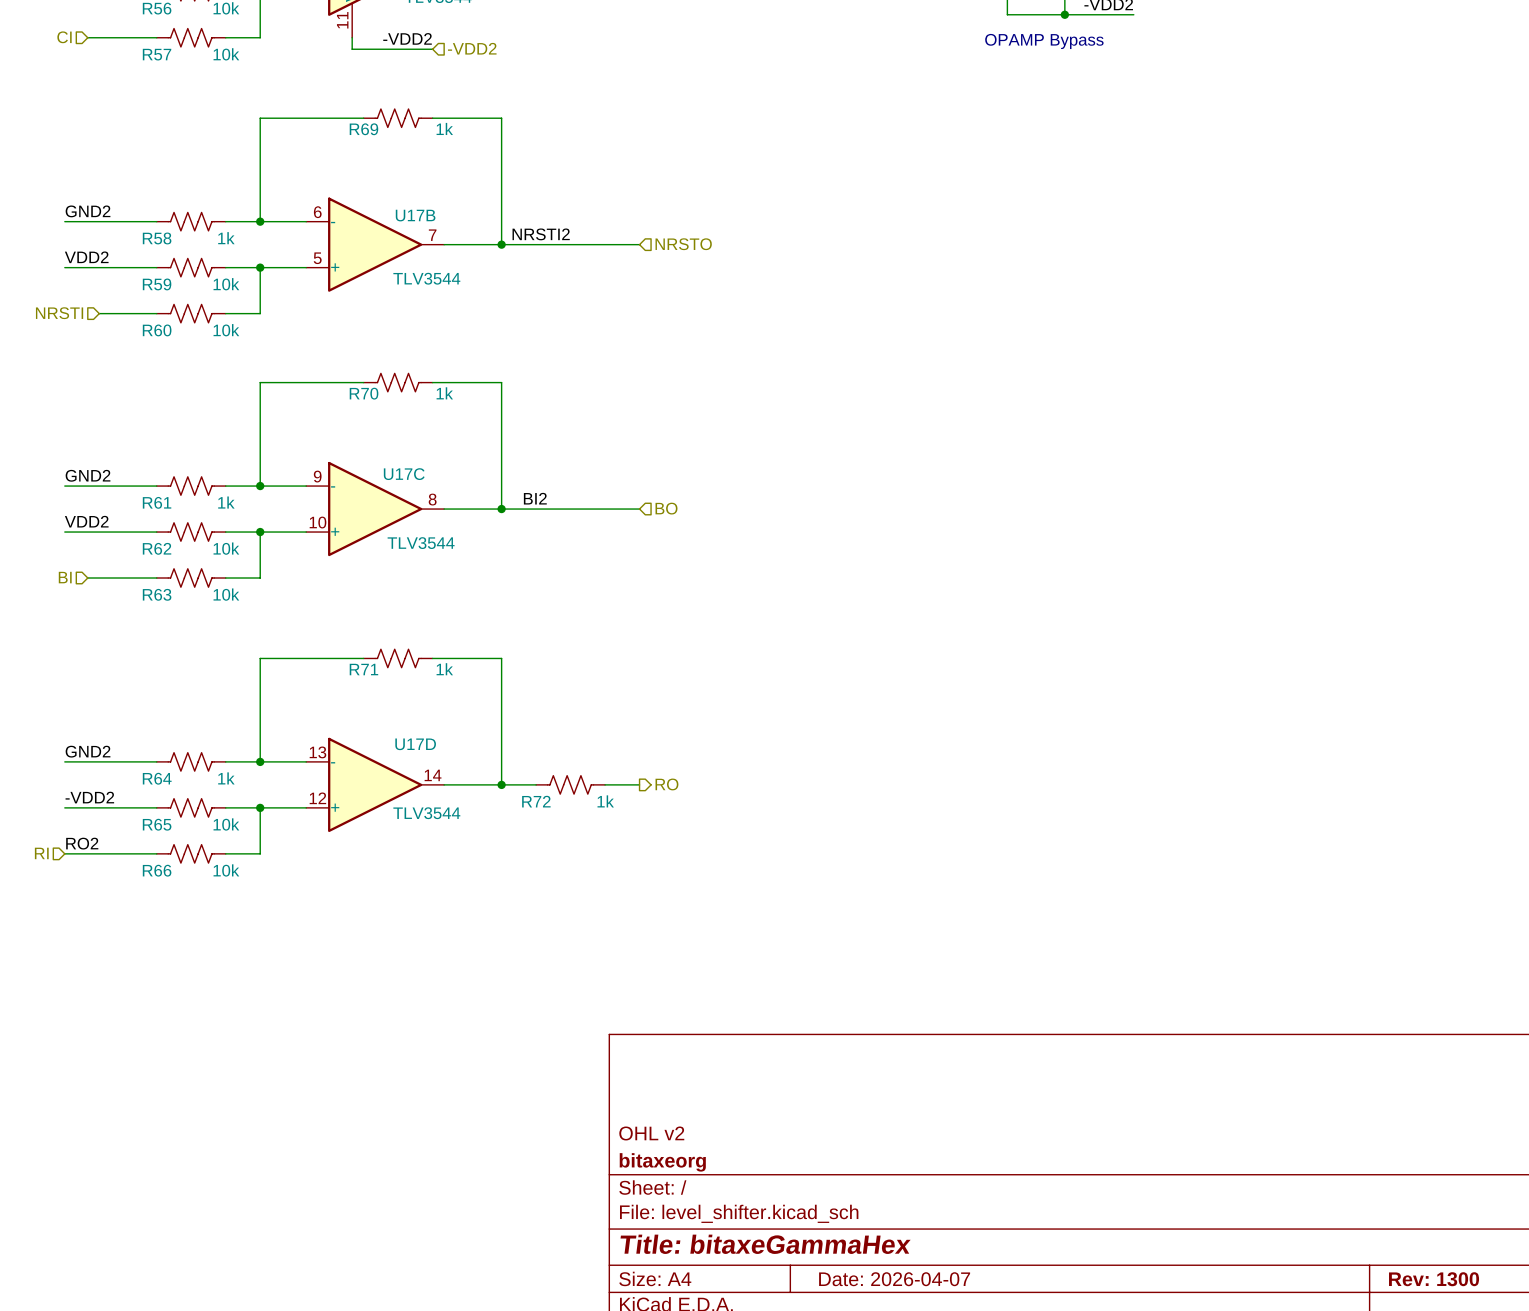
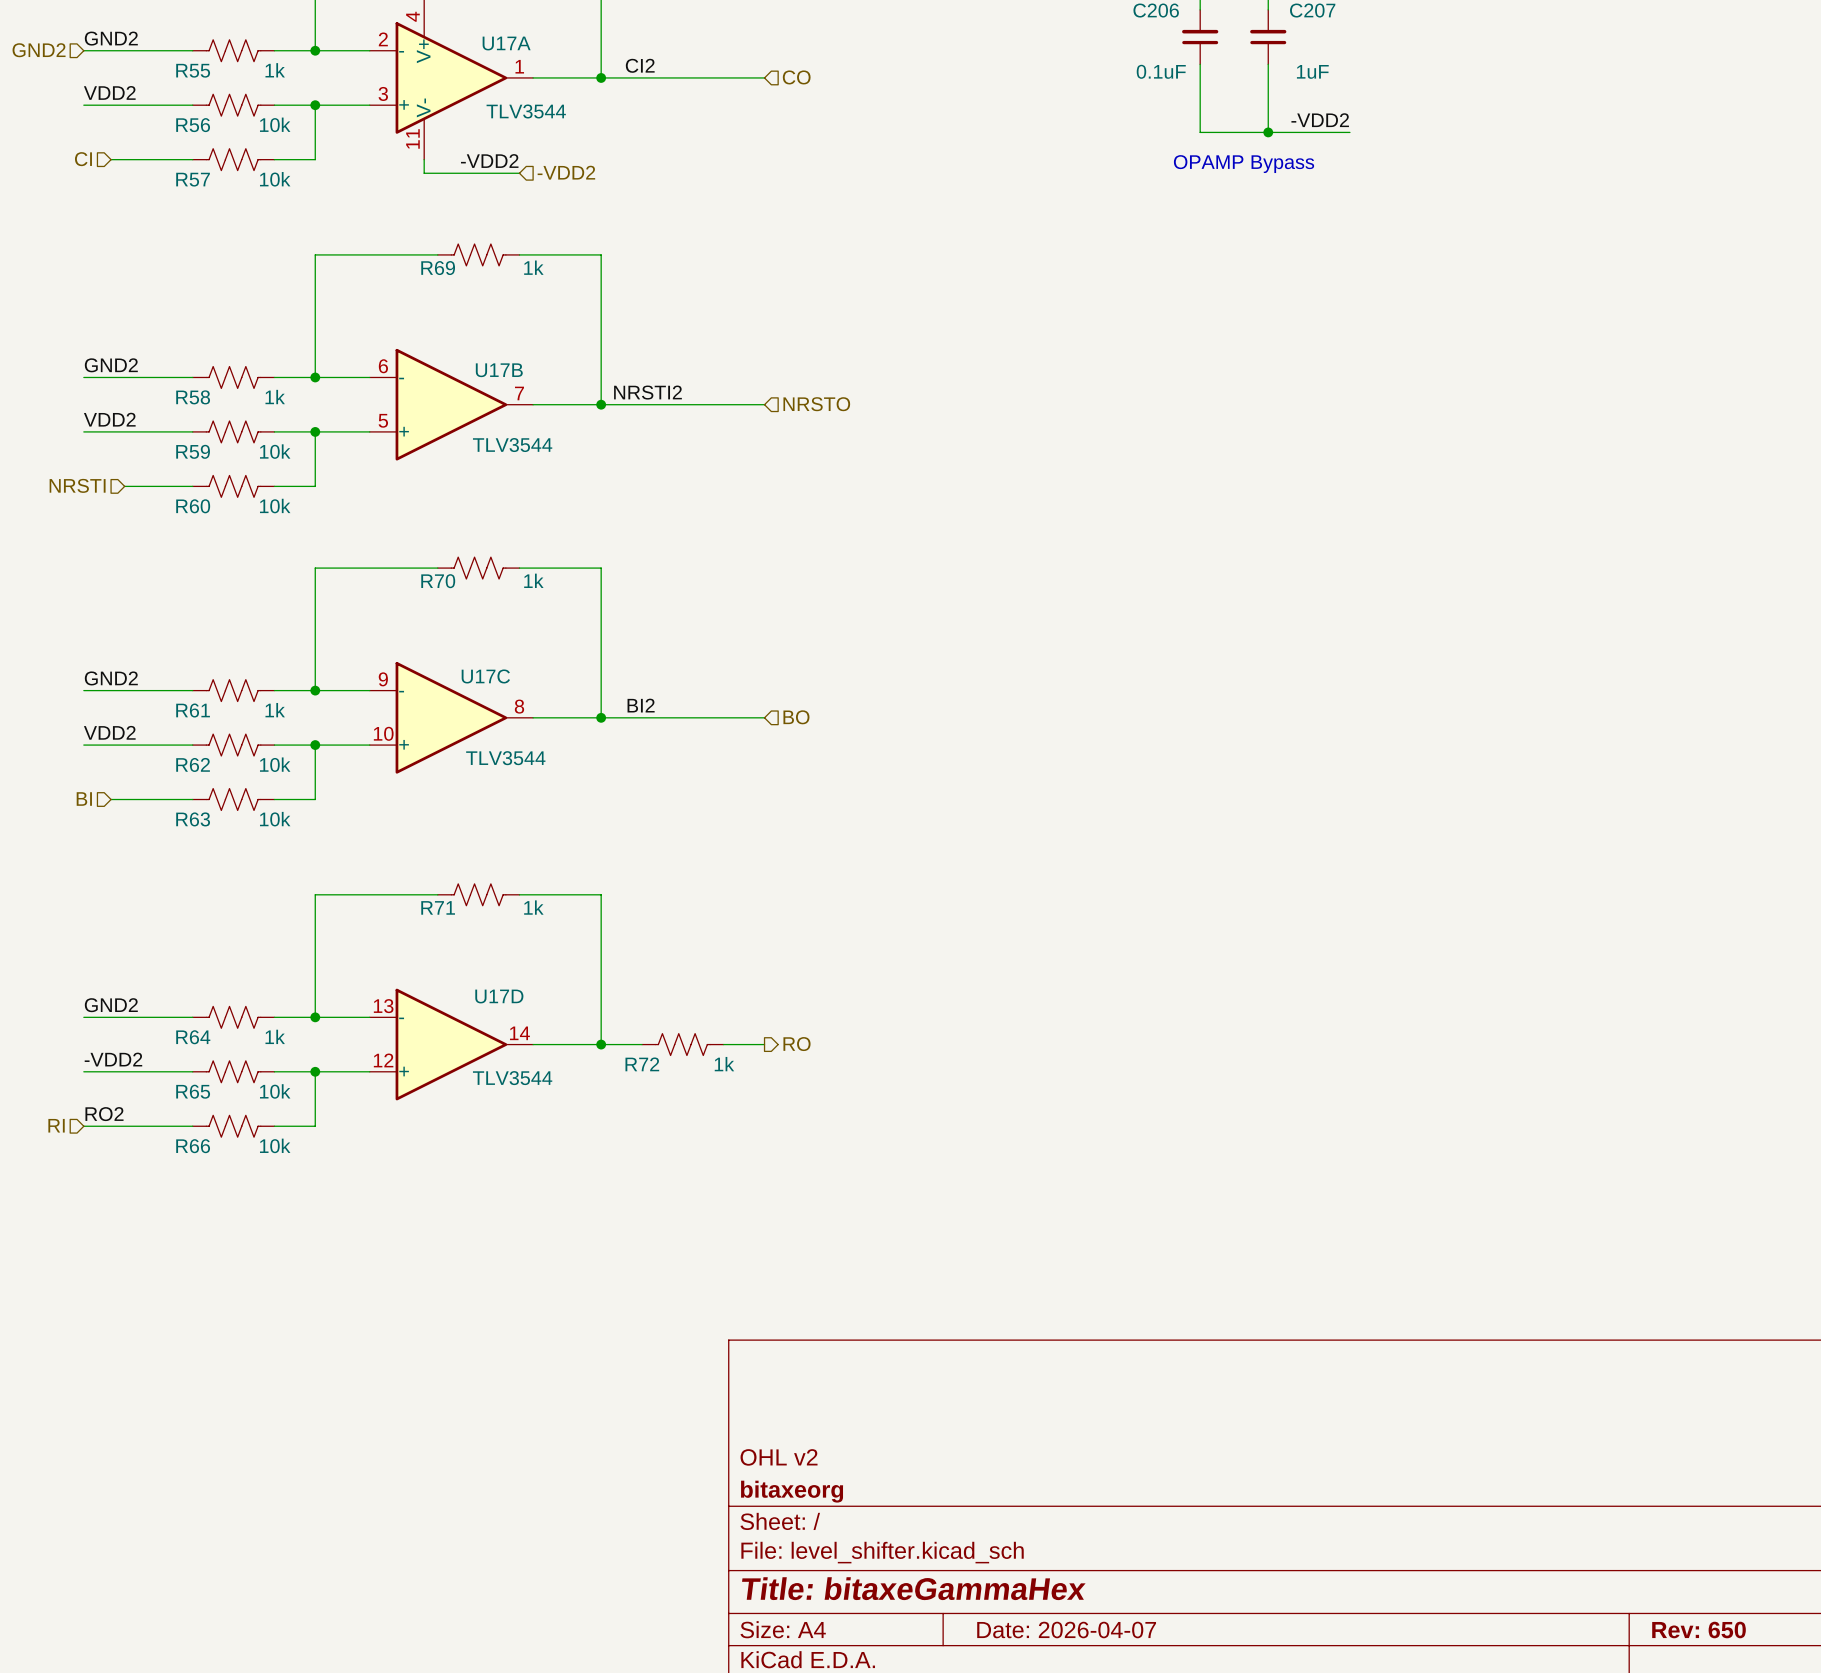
title block: Rev: 1300 (1434, 1279) -> Rev: 650 (1699, 1630)

